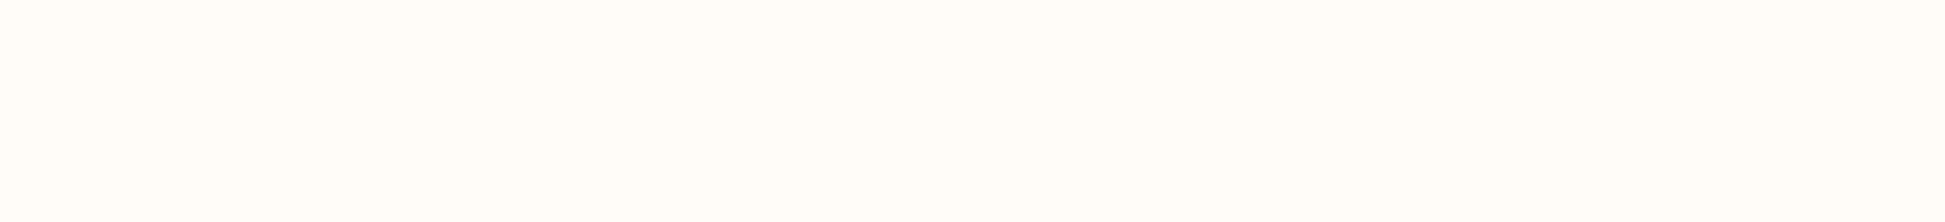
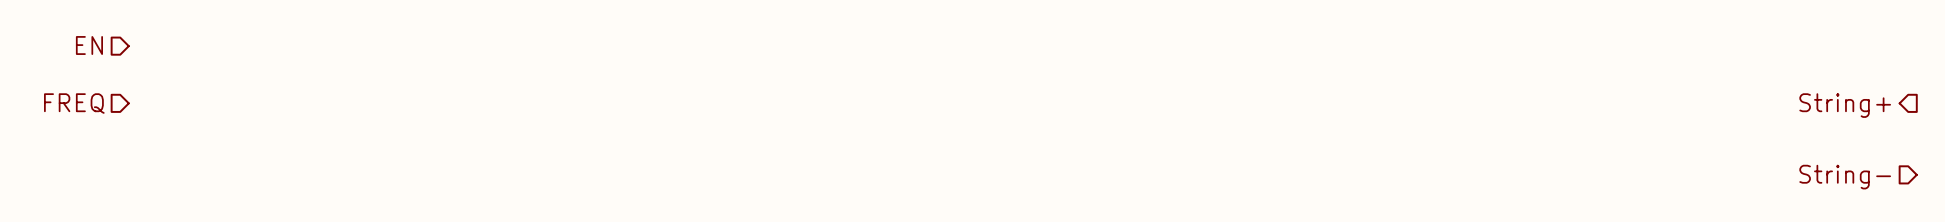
hierarchical label: none -> EN (89, 45)
hierarchical label: none -> FREQ (74, 103)
hierarchical label: none -> String+ (1845, 105)
hierarchical label: none -> String- (1845, 177)

